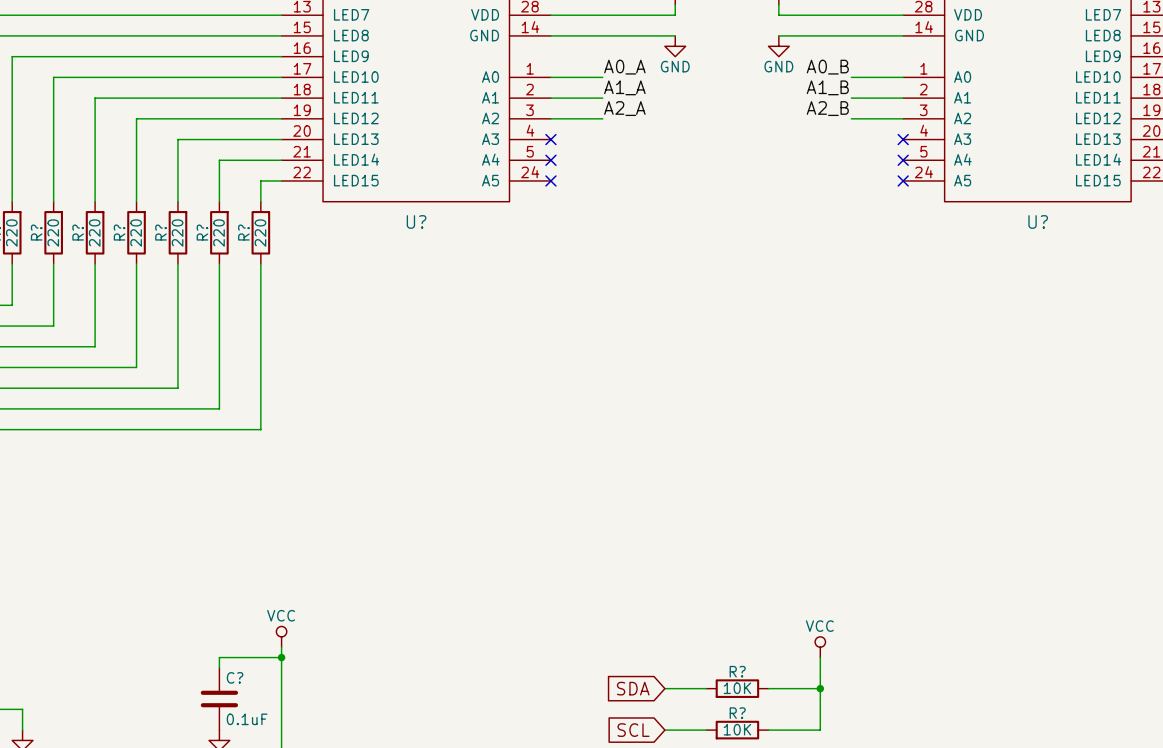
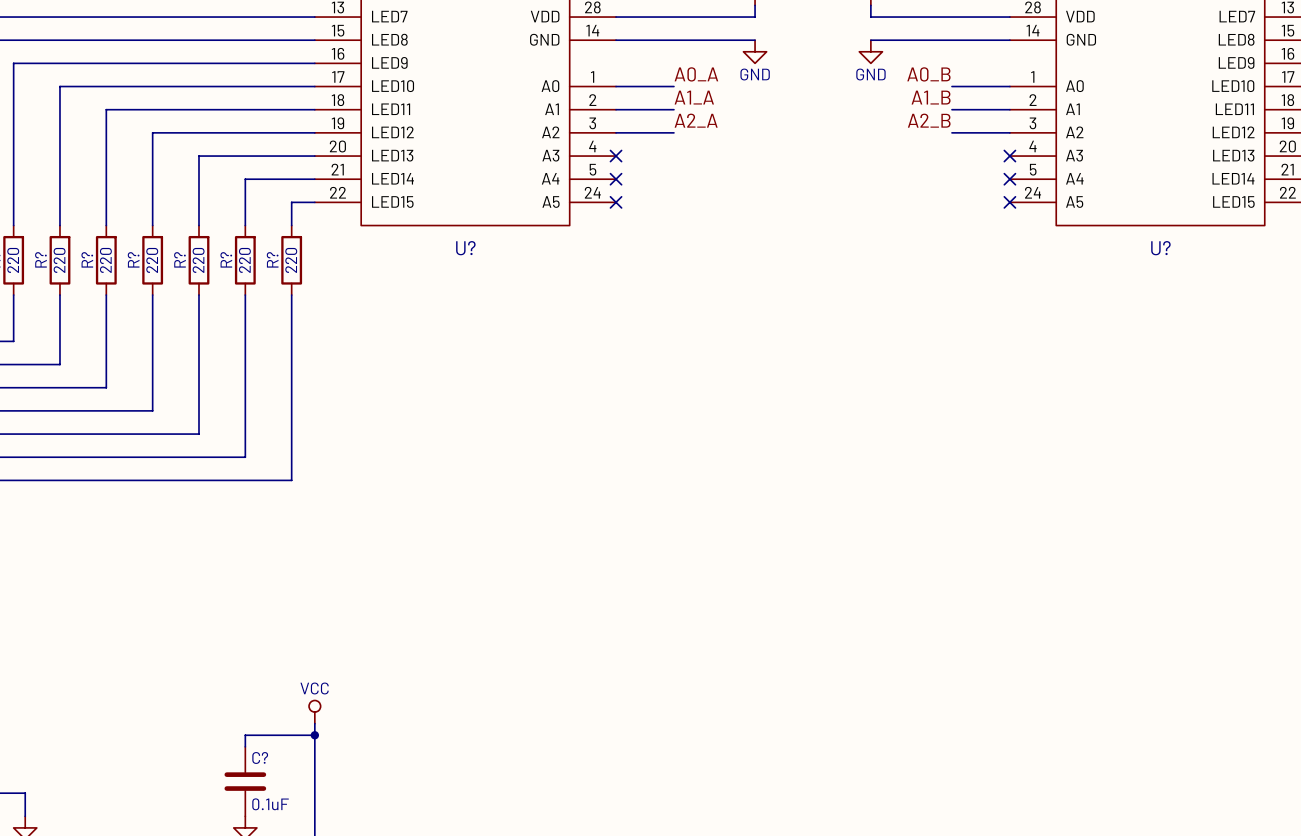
power symbol: VCC (820, 647) -> none
wire: (820, 657) (820, 730) (768, 730) -> none
global label: SDA (633, 688) -> none
wire: (664, 688) (706, 688) -> none
R?: 10K (737, 688) -> none
wire: (768, 688) (820, 688) -> none
junction: (820, 688) -> none
global label: SCL (633, 730) -> none
wire: (664, 730) (706, 730) -> none
R?: 10K (737, 730) -> none

